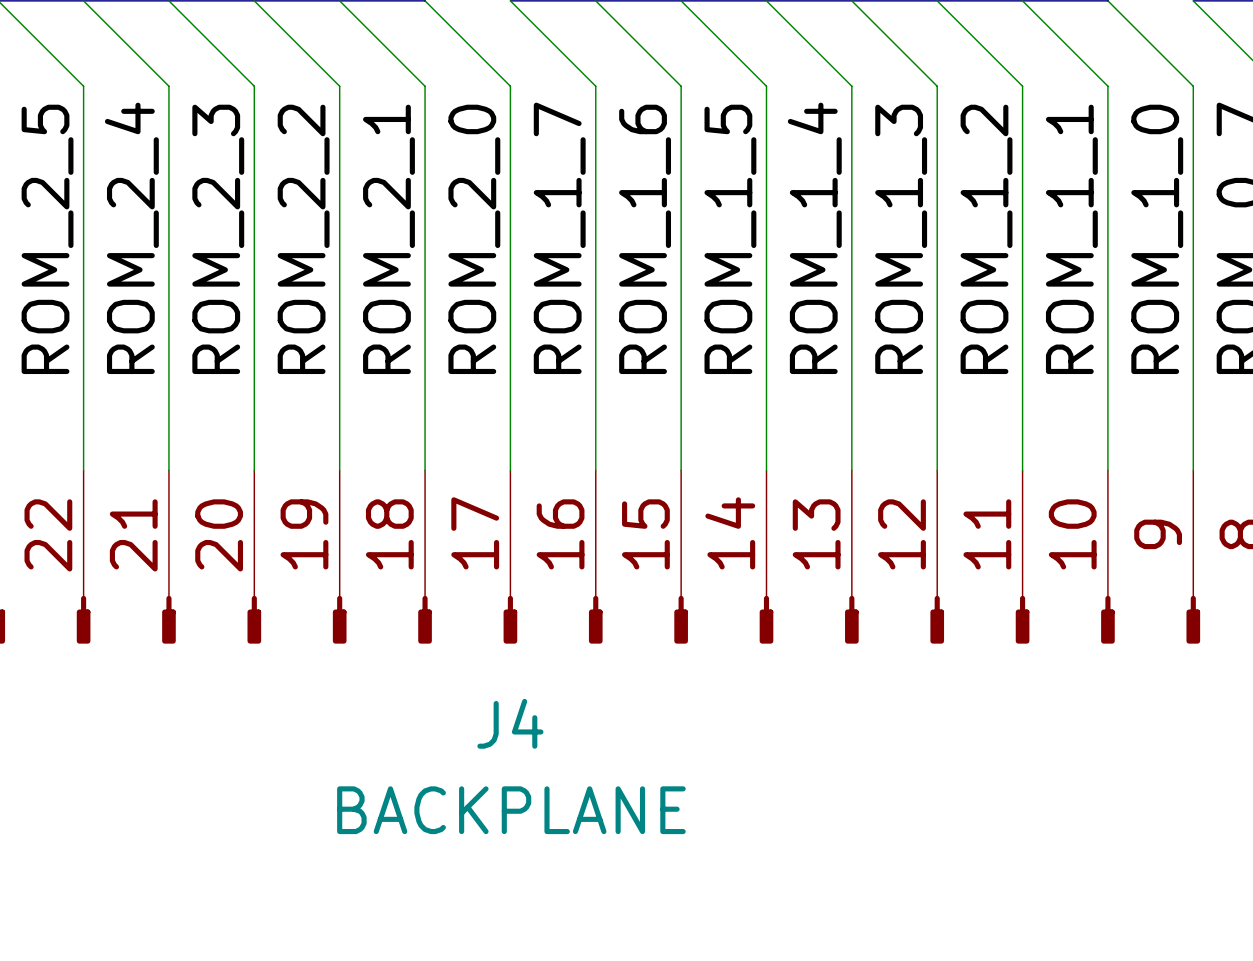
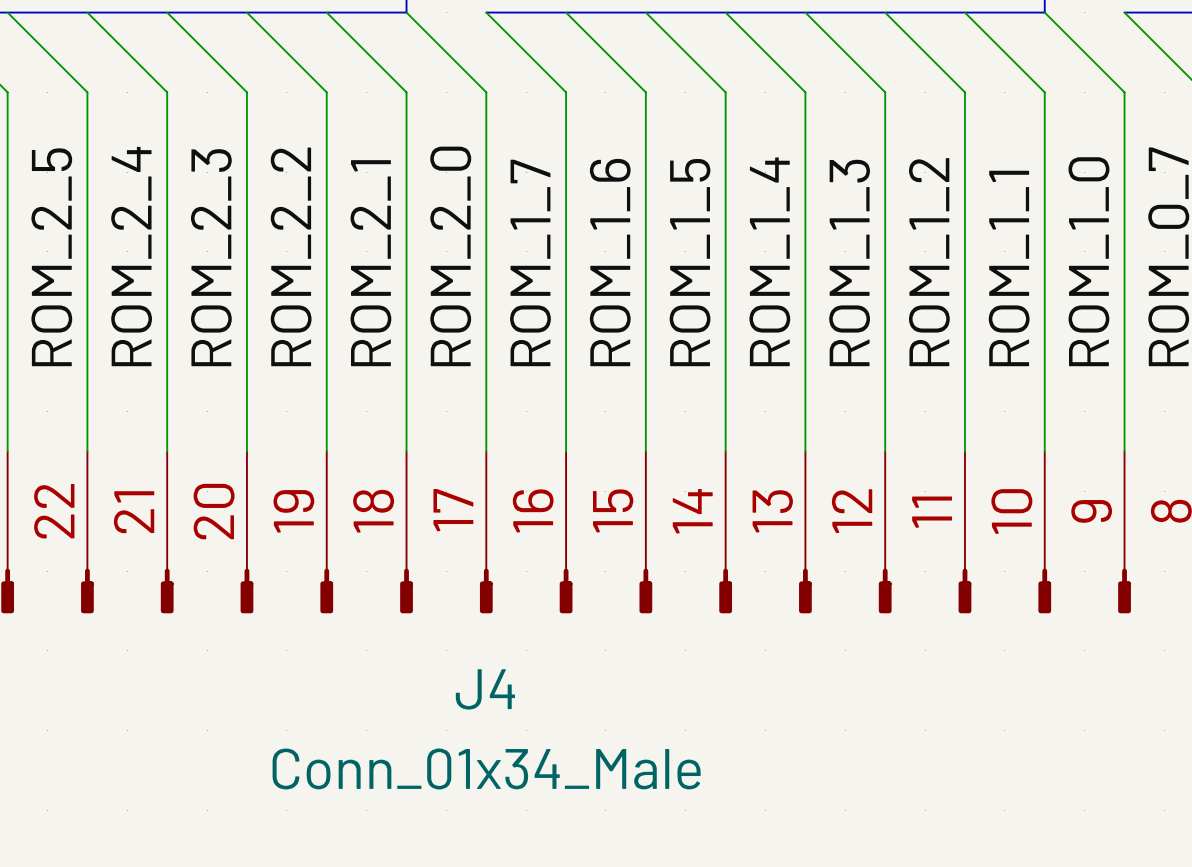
J4 value: BACKPLANE (511, 810) -> Conn_01x34_Male (486, 768)

